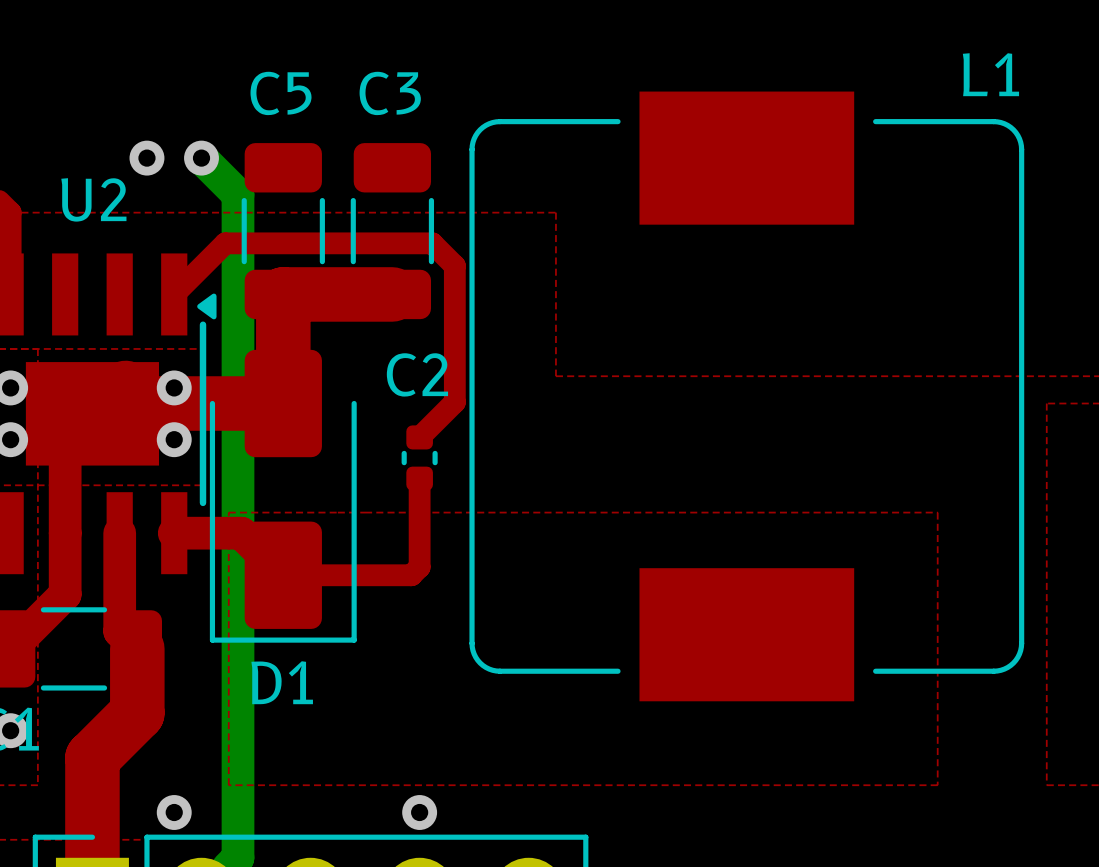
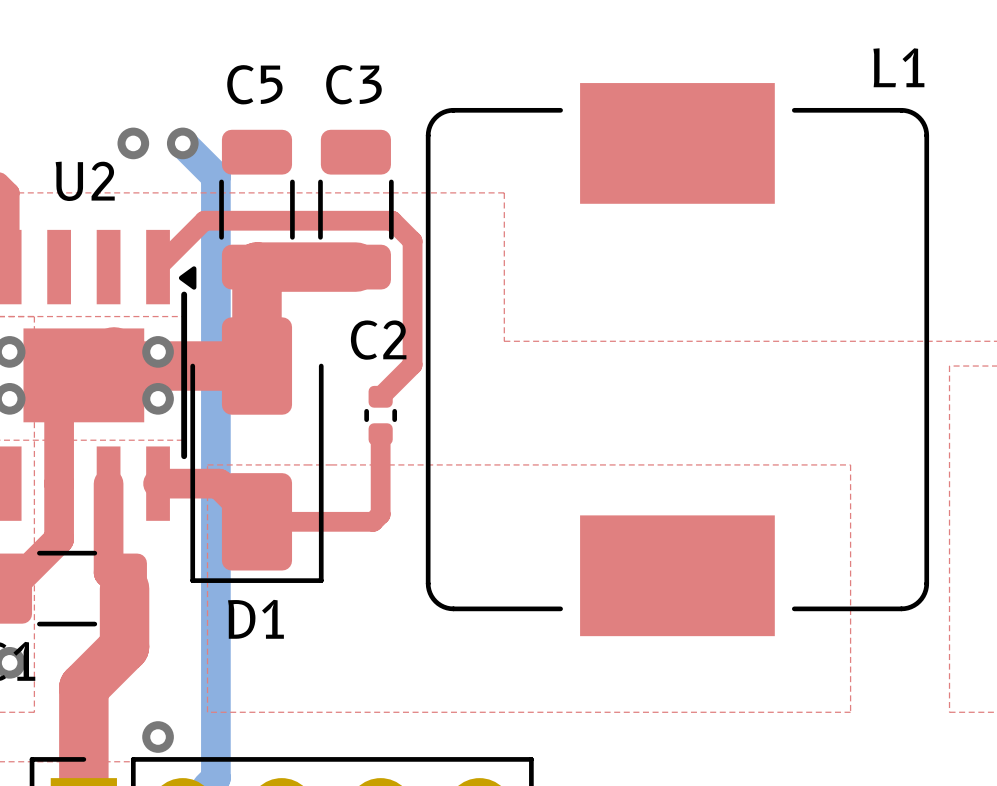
via: (419, 812) -> none

